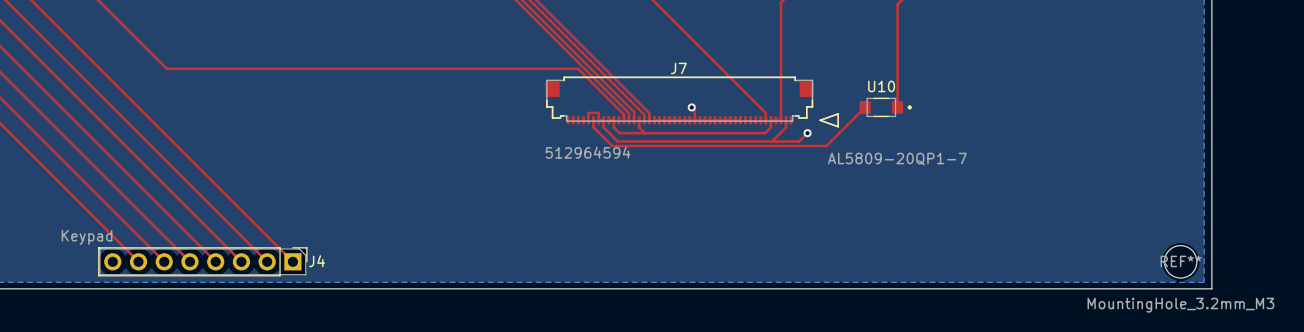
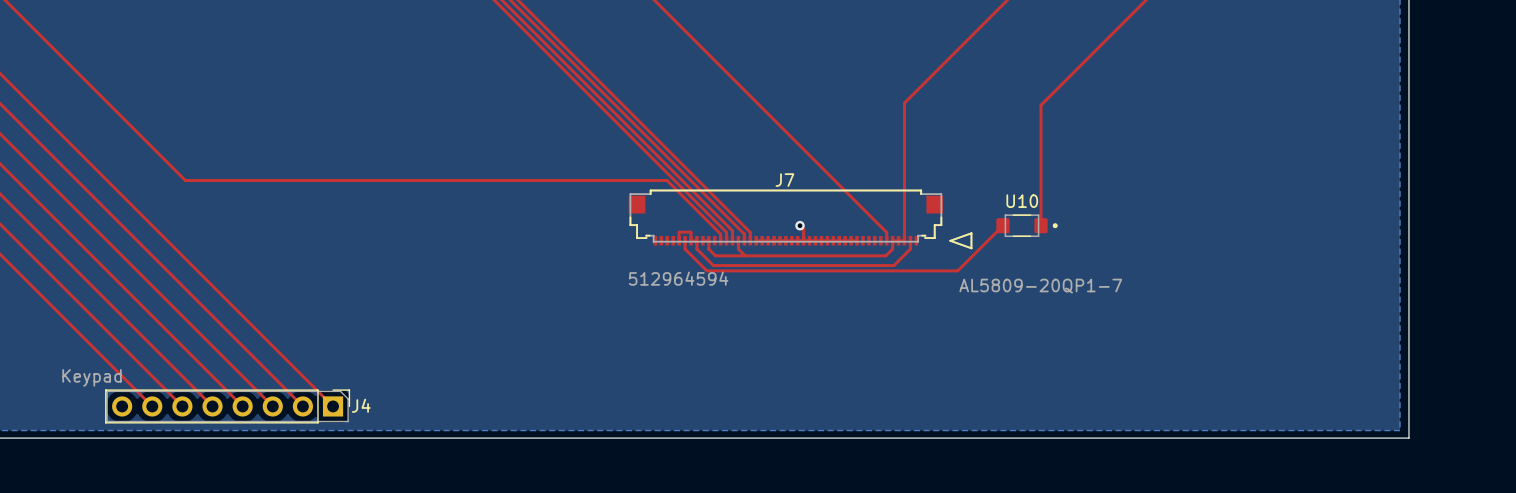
top track: (807, 133) (799, 141) (772, 141) -> none
via: (807, 133) -> none
REF**: MountingHole_3.2mm_M3 (1180, 261) -> none

